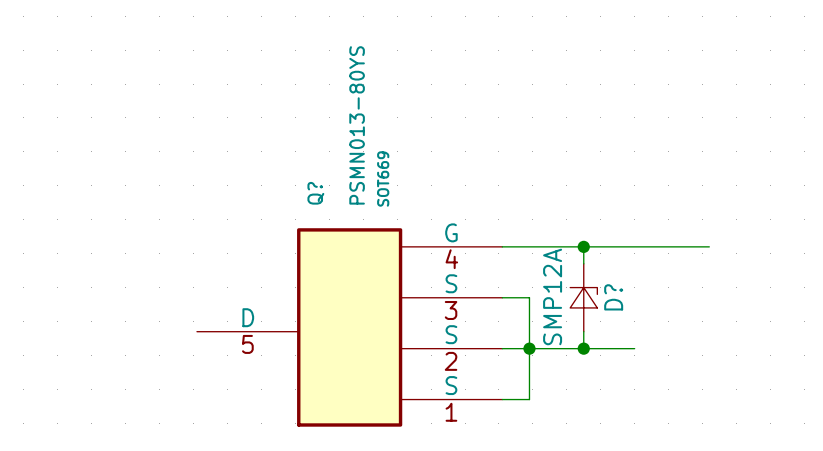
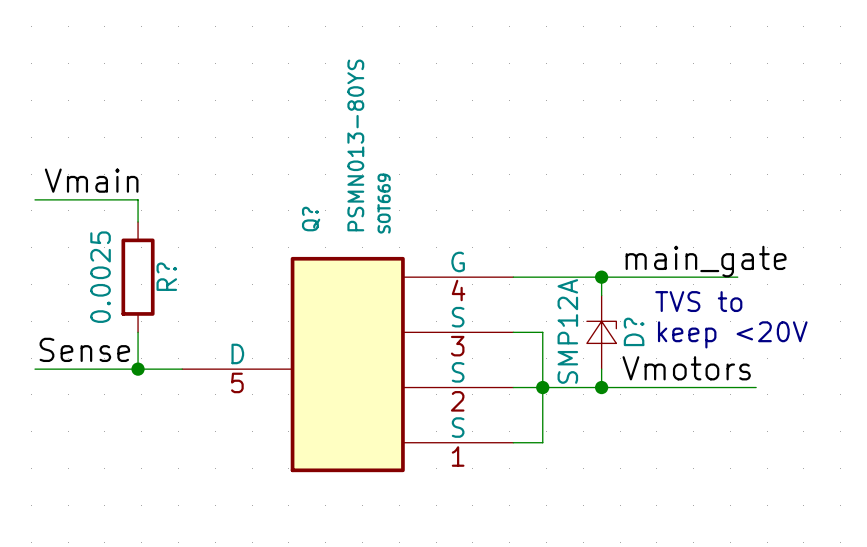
label: none -> Vmain (91, 180)
wire: none -> (35, 199) (138, 199) (138, 221)
label: none -> main_gate (706, 261)
R?: none -> 0.0025 (138, 277)
text: none -> TVS to (698, 301)
wire: none -> (138, 332) (138, 369)
text: none -> keep <20V (732, 334)
label: none -> Sense (84, 349)
label: none -> Vmotors (686, 368)
wire: none -> (35, 369) (182, 369)
junction: none -> (138, 369)
wire: none -> (656, 387) (756, 387)

